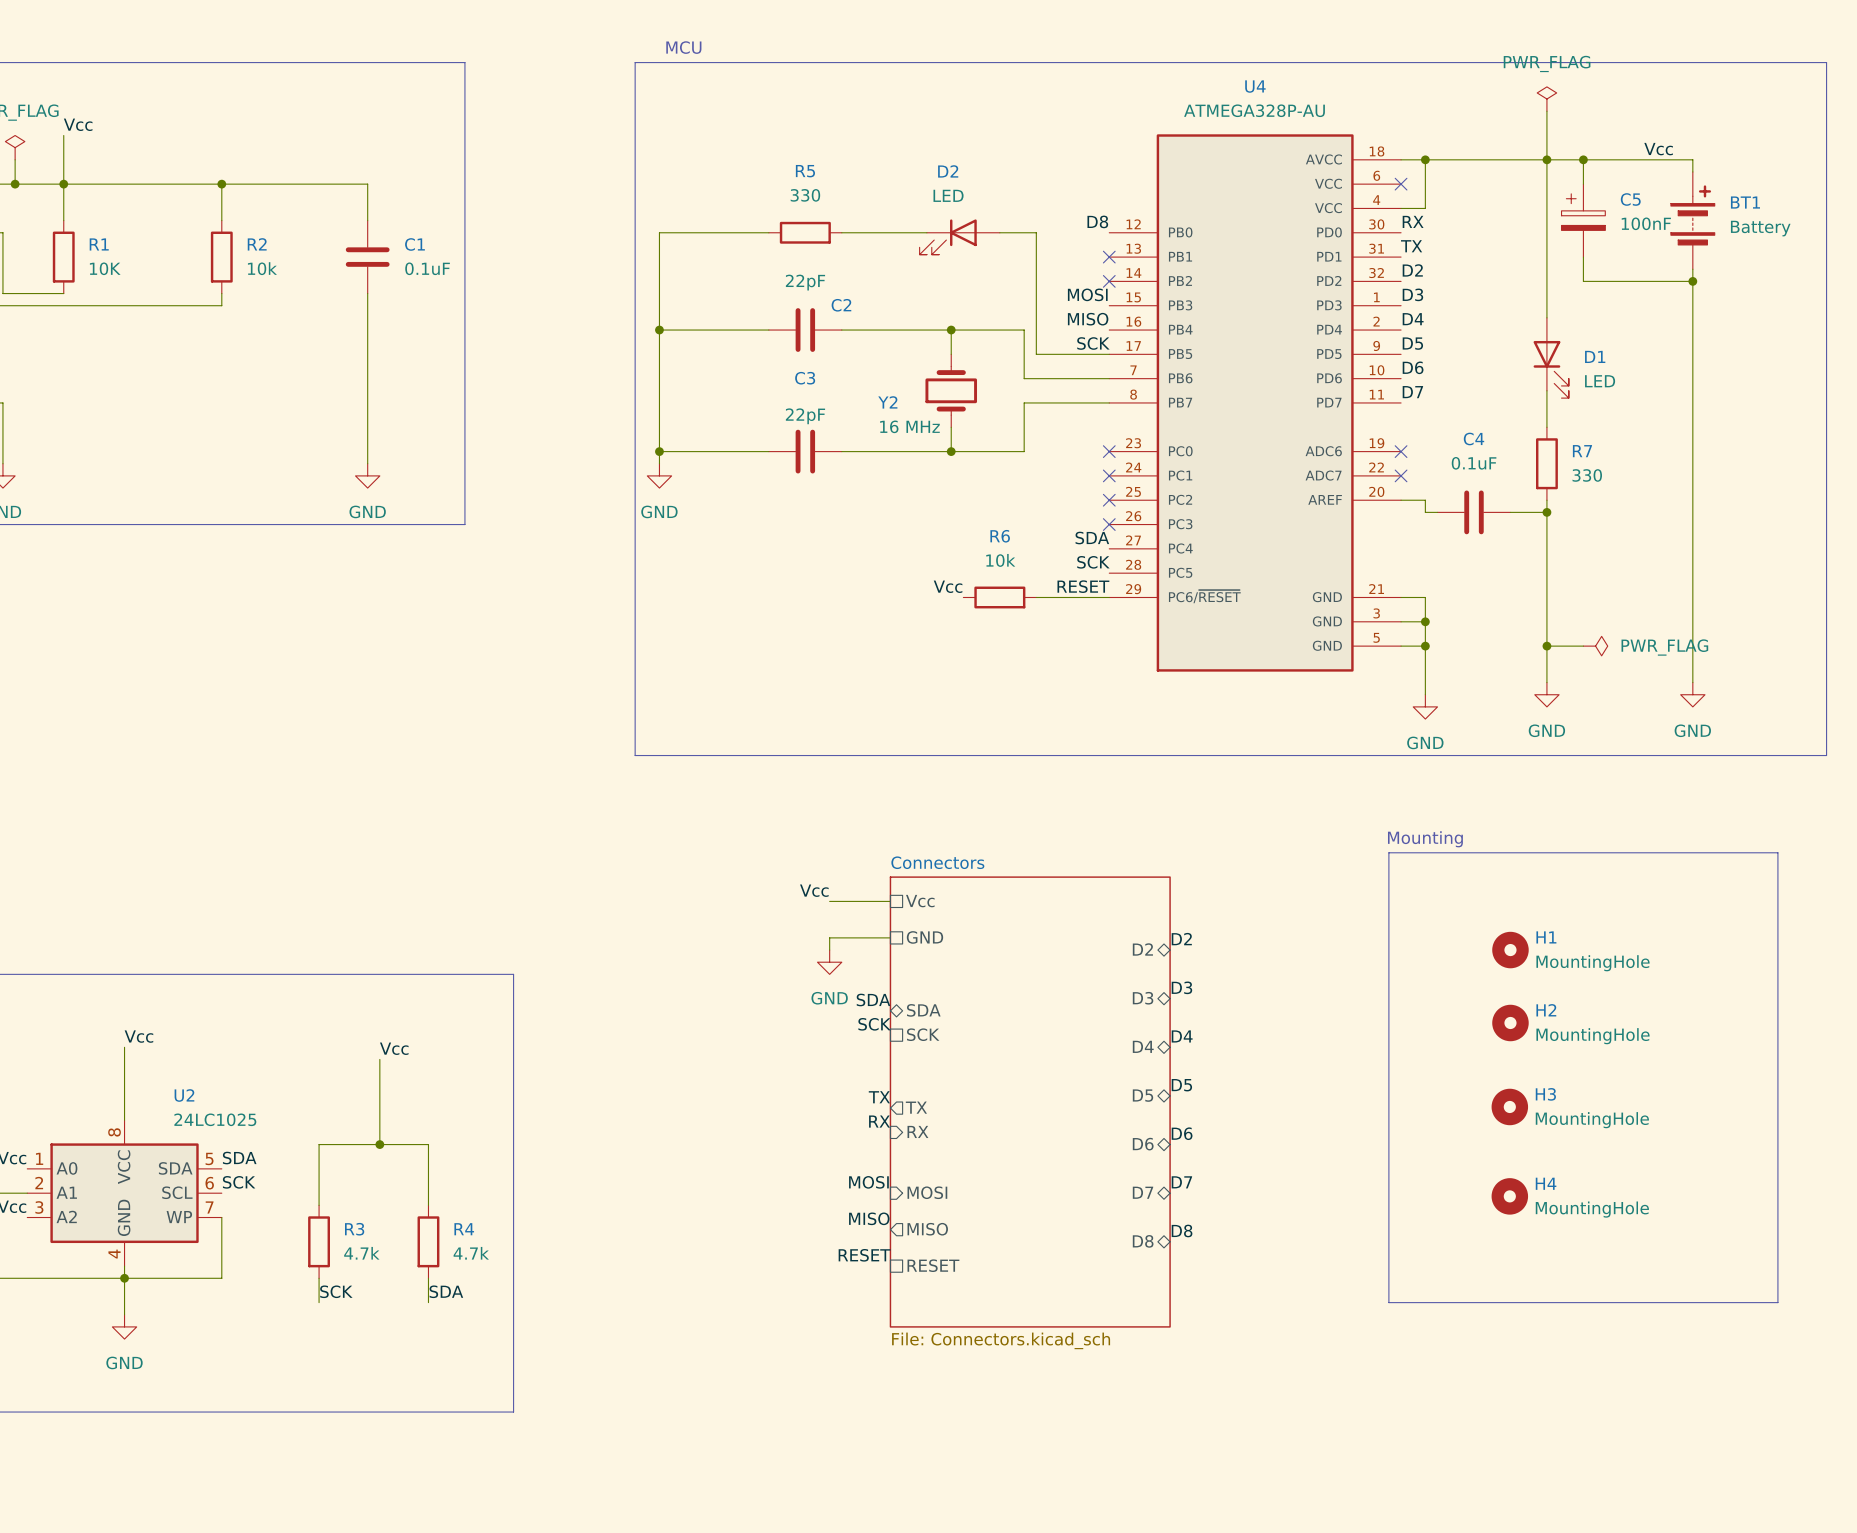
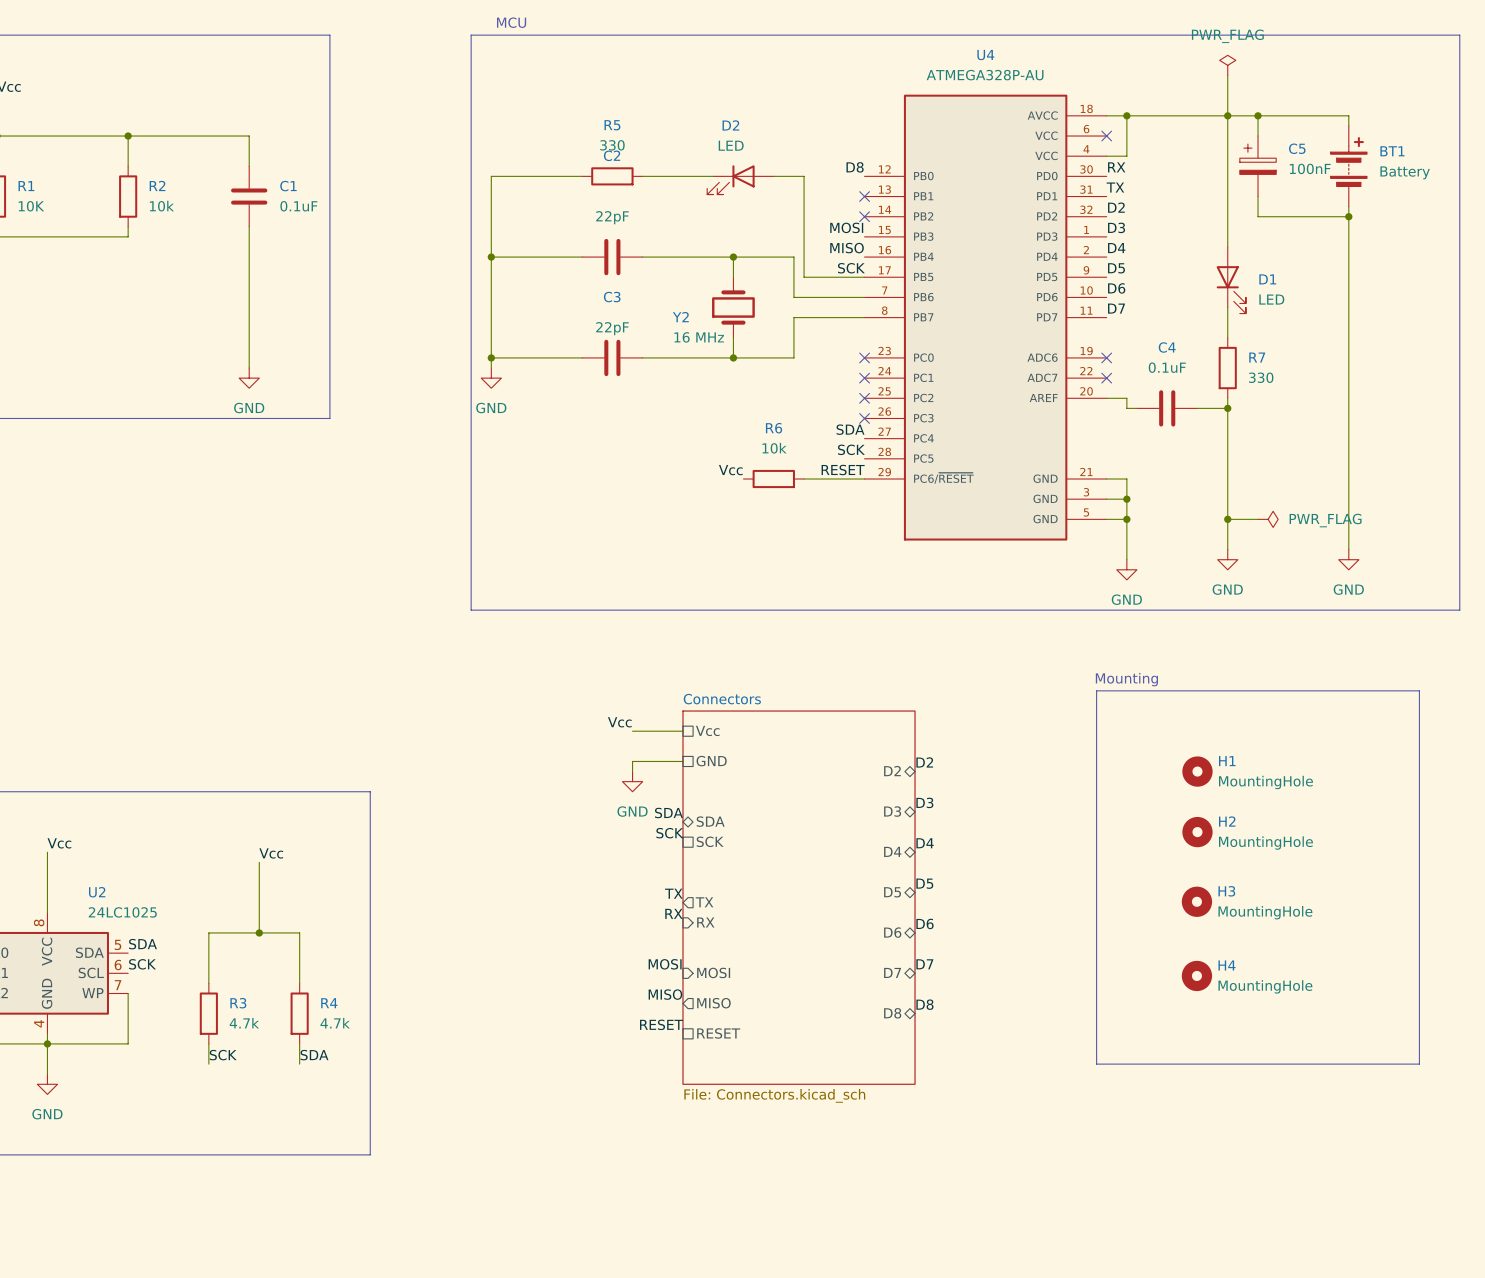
label: Vcc (1658, 149) -> none
C2 name position: C2 (841, 305) -> C2 (612, 155)

